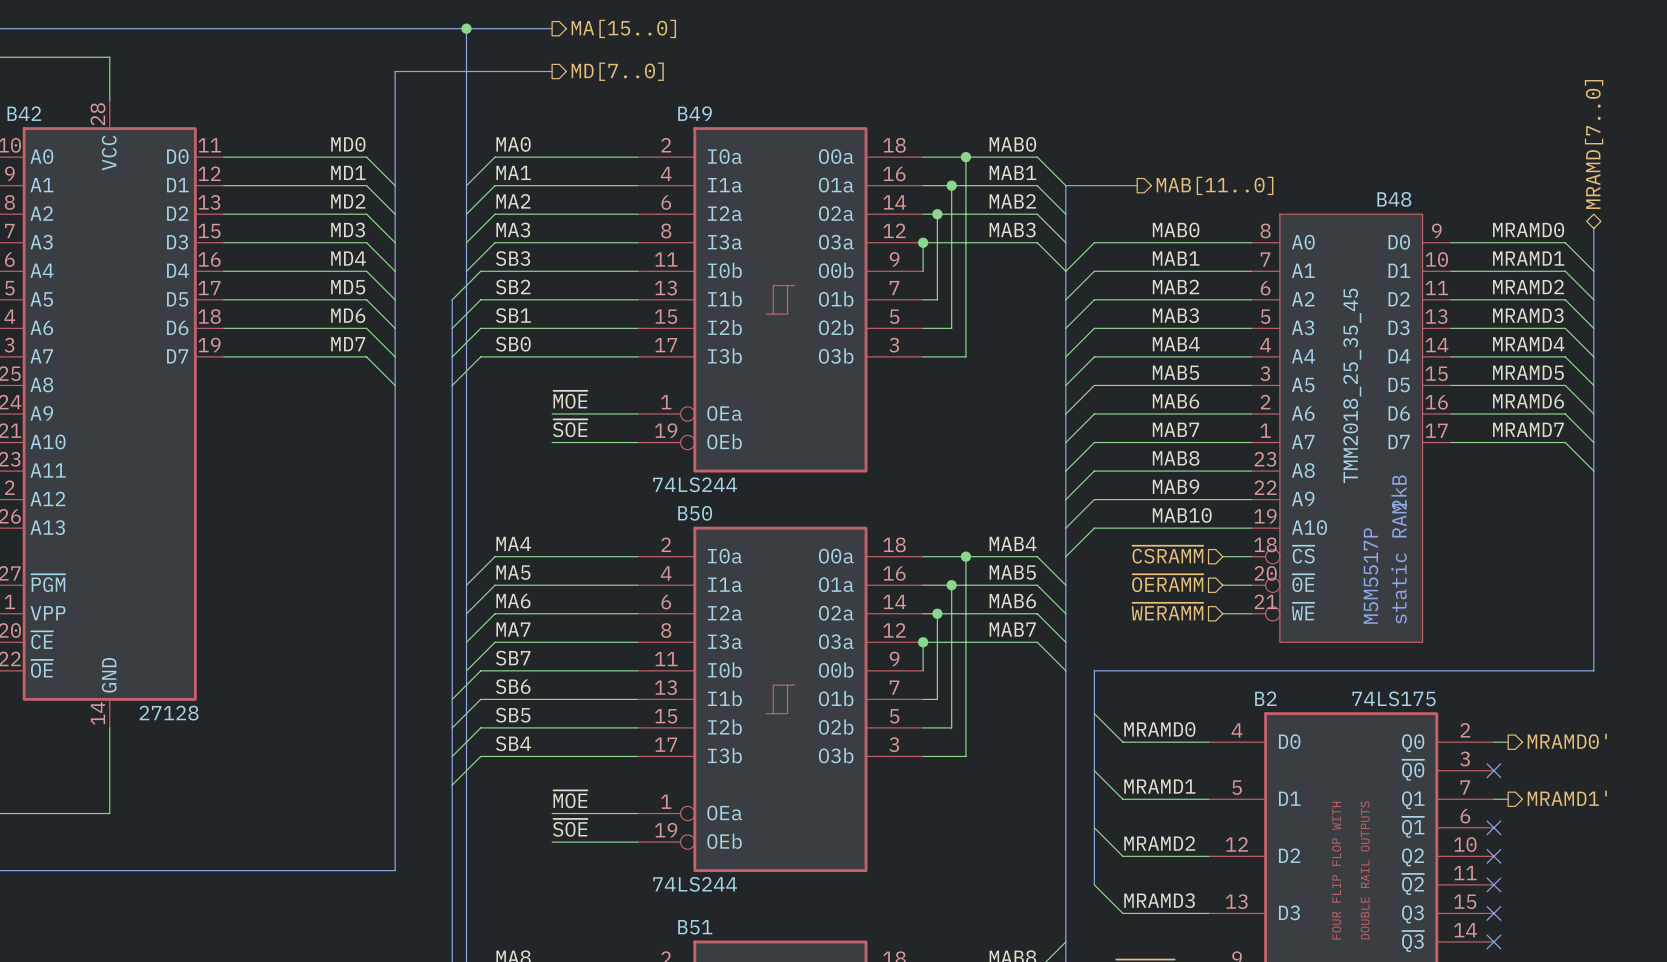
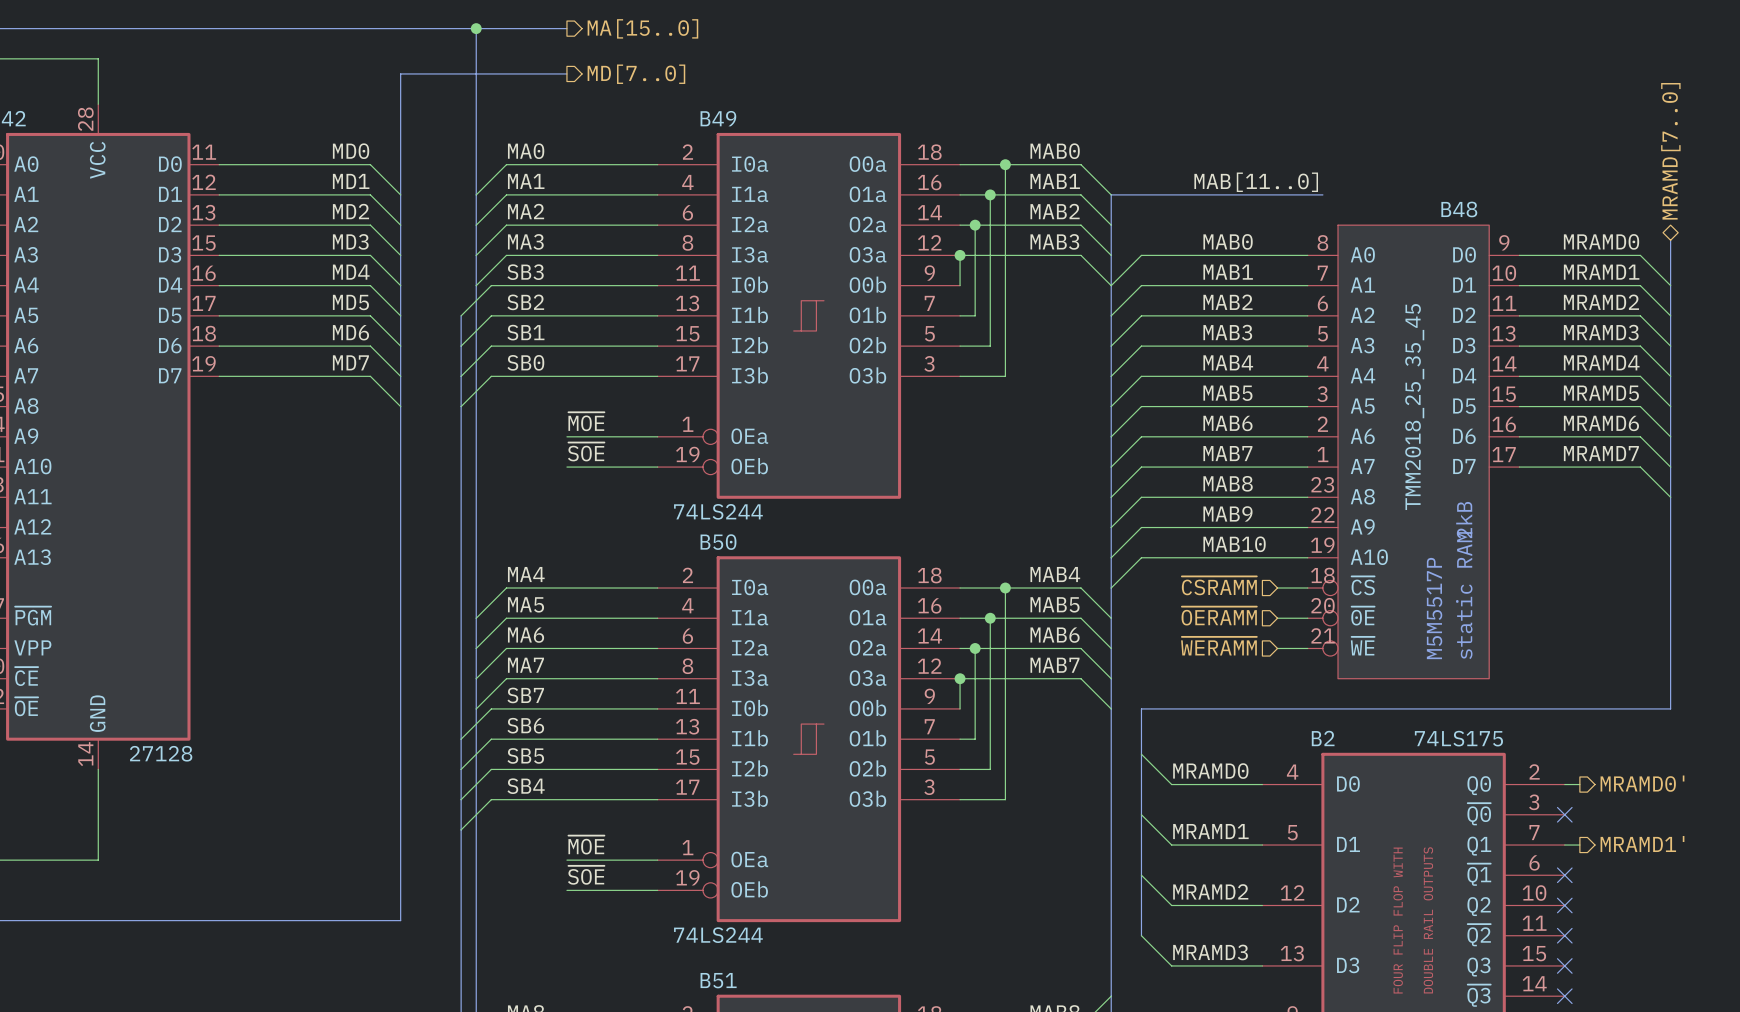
label: none -> MAB[11..0] (1256, 182)
bus: none -> (1186, 194) (1322, 194)
hierarchical label: MAB[11..0] (1215, 185) -> none

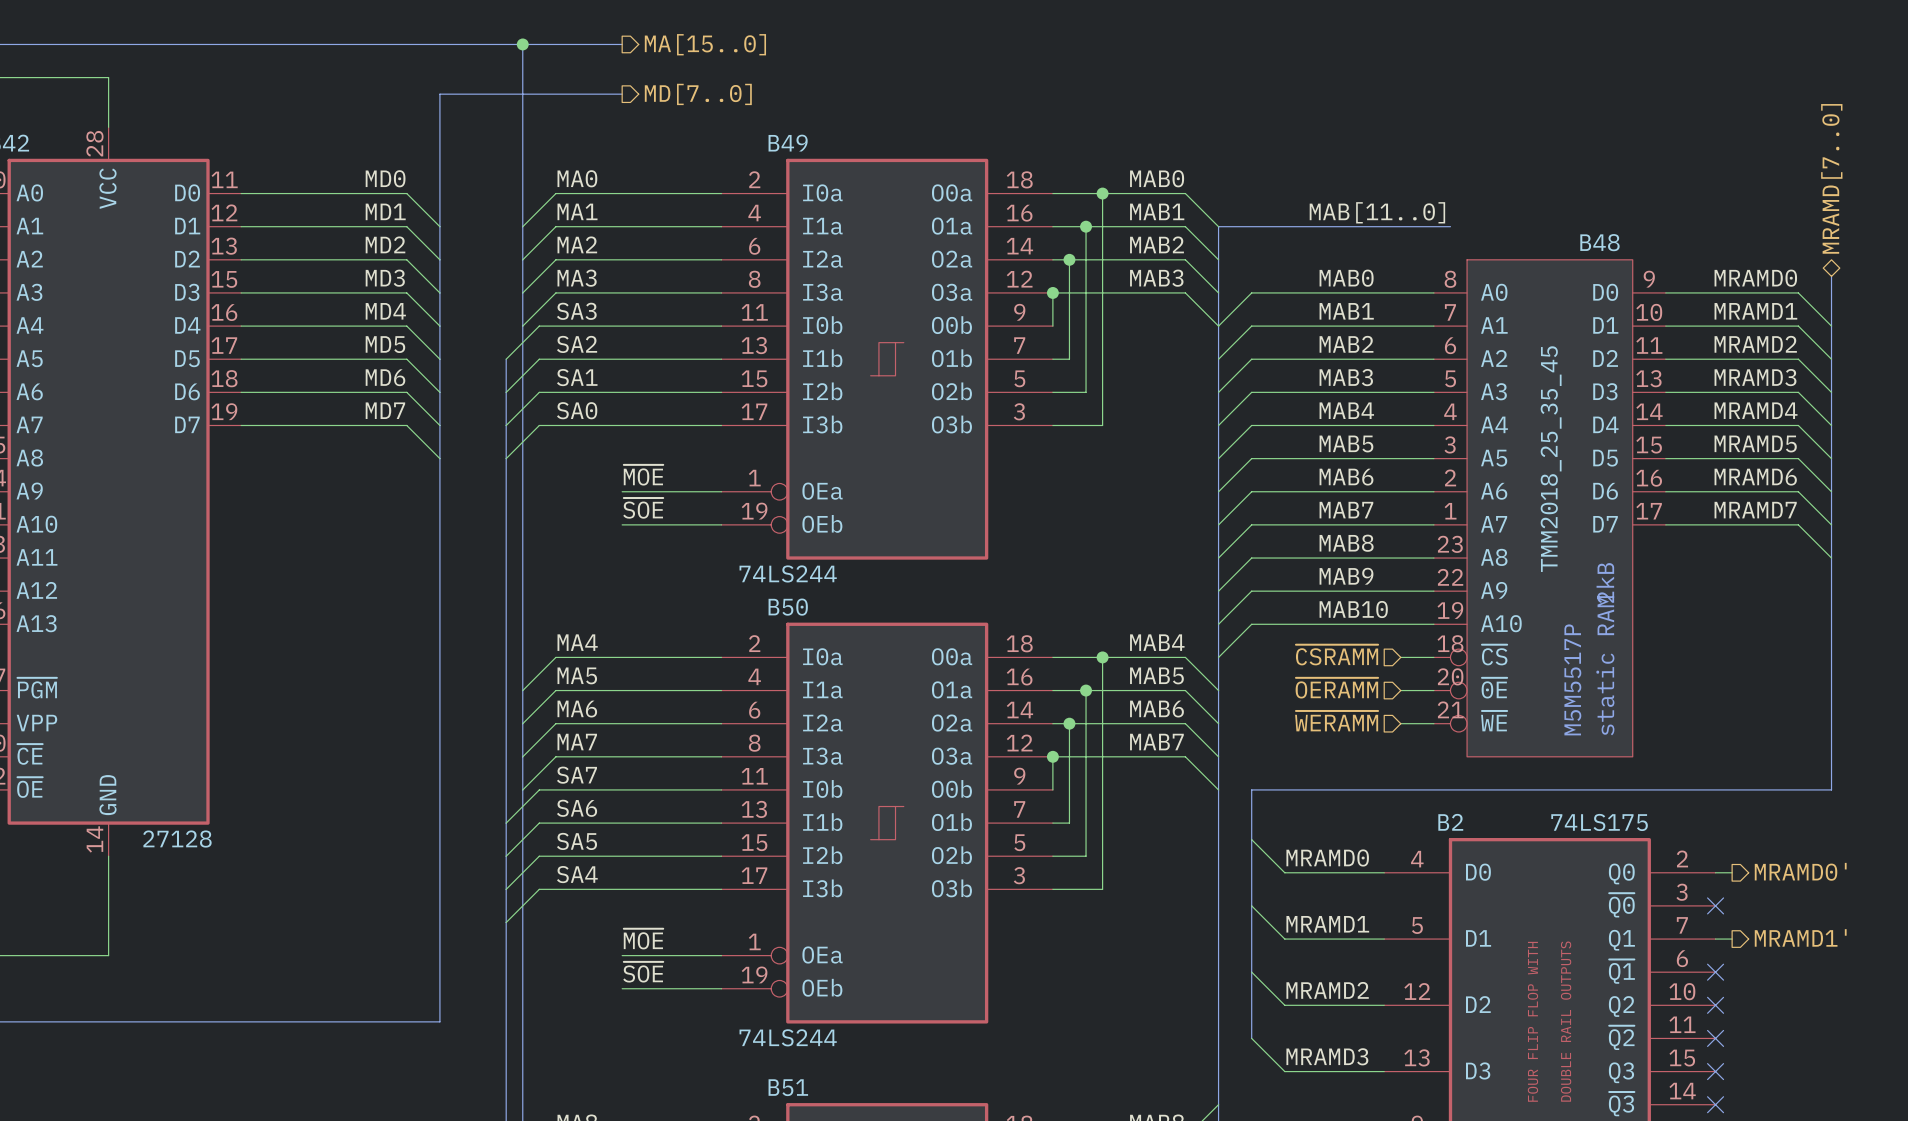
label: SB3 (525, 272) -> SA3 (576, 311)
label: SB2 (525, 302) -> SA2 (577, 344)
label: SB1 (525, 332) -> SA1 (577, 377)
label: SB0 (525, 362) -> SA0 (577, 410)
label: SB7 (525, 695) -> SA7 (576, 775)
label: SB6 (525, 725) -> SA6 (577, 808)
label: SB5 (525, 755) -> SA5 (577, 841)
label: SB4 (526, 786) -> SA4 (577, 874)

